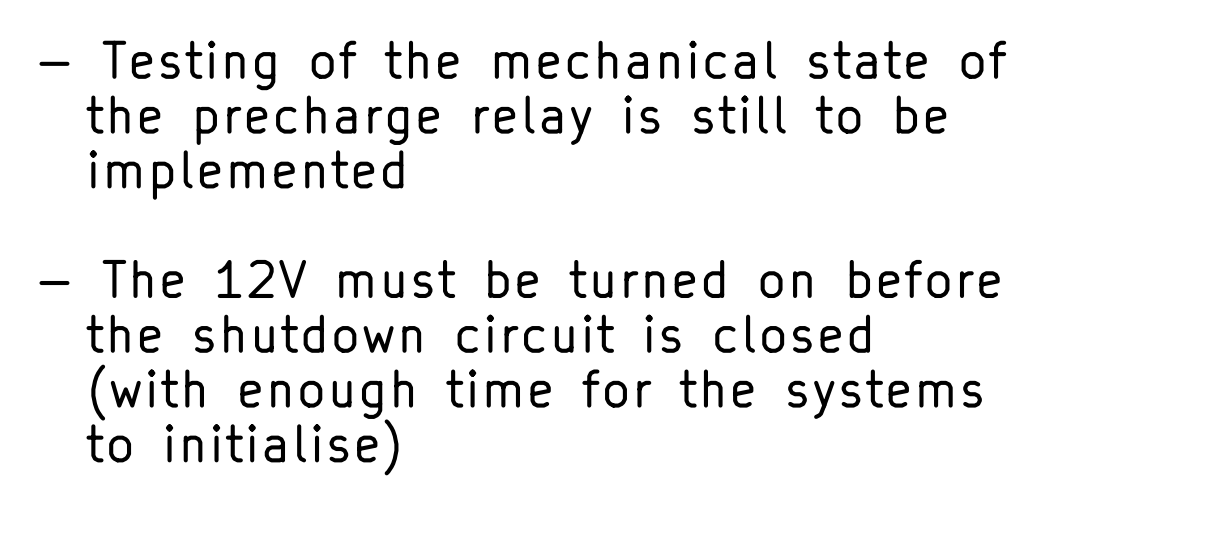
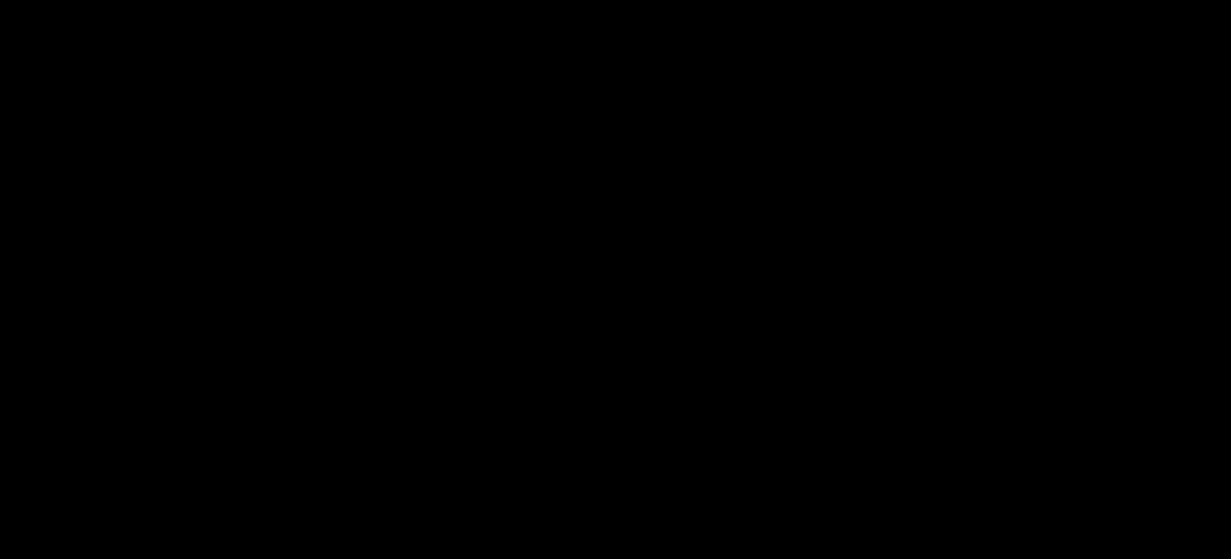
text: - Testing of the mechanical state of (522, 65) -> none
text: the precharge relay is still to be (516, 120) -> none
text: implemented (246, 175) -> none
text: - The 12V must be turned on before (519, 278) -> none
text: the shutdown circuit is closed (478, 333) -> none
text: (with enough time for the systems (536, 392) -> none
text: to initialise) (242, 447) -> none

